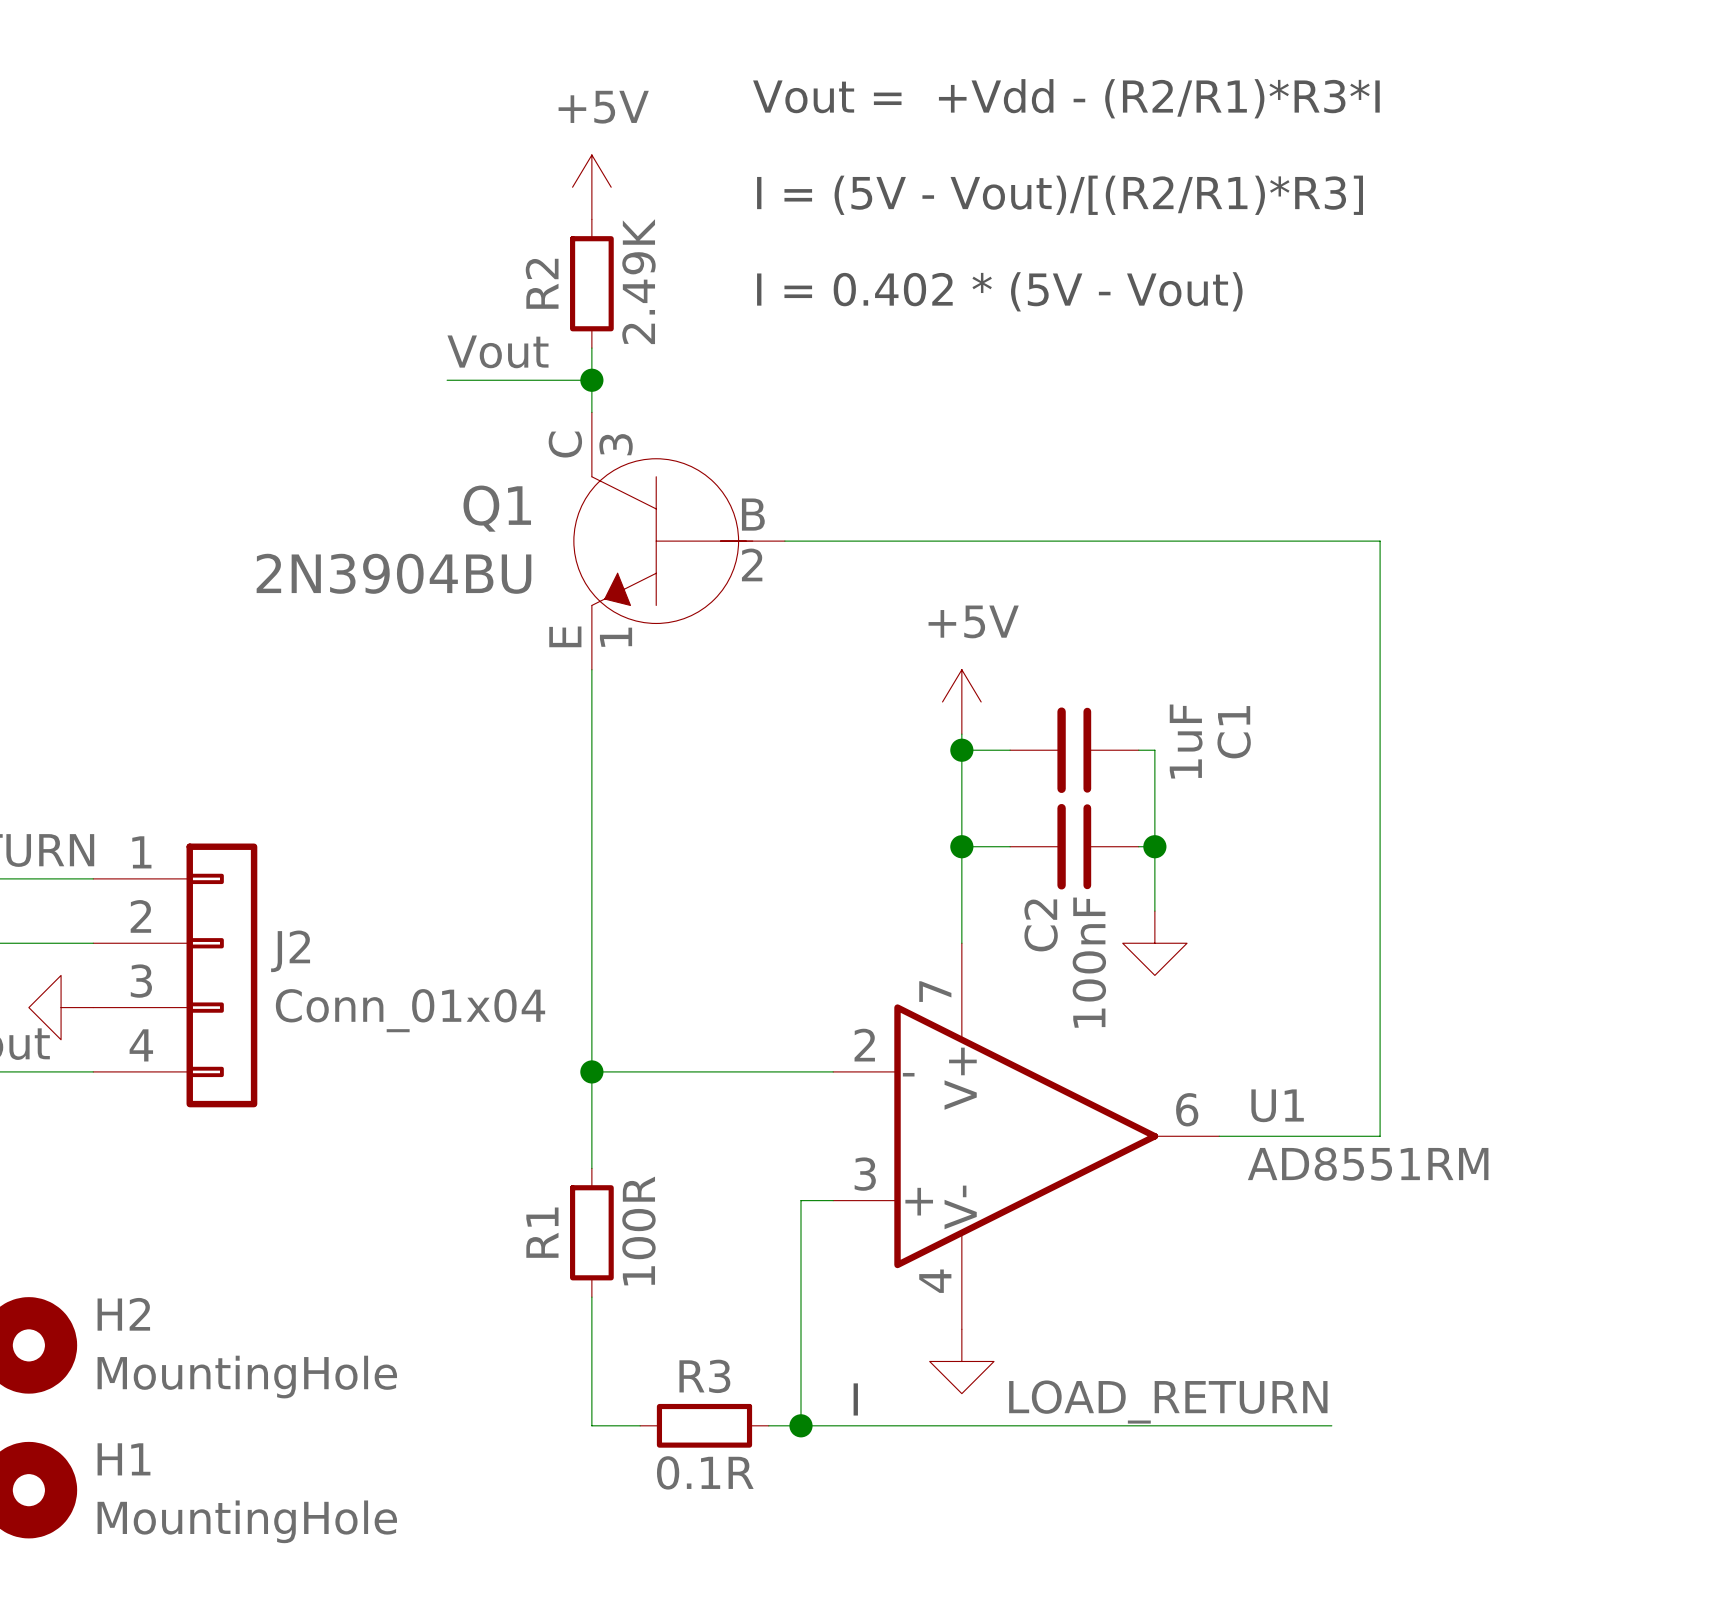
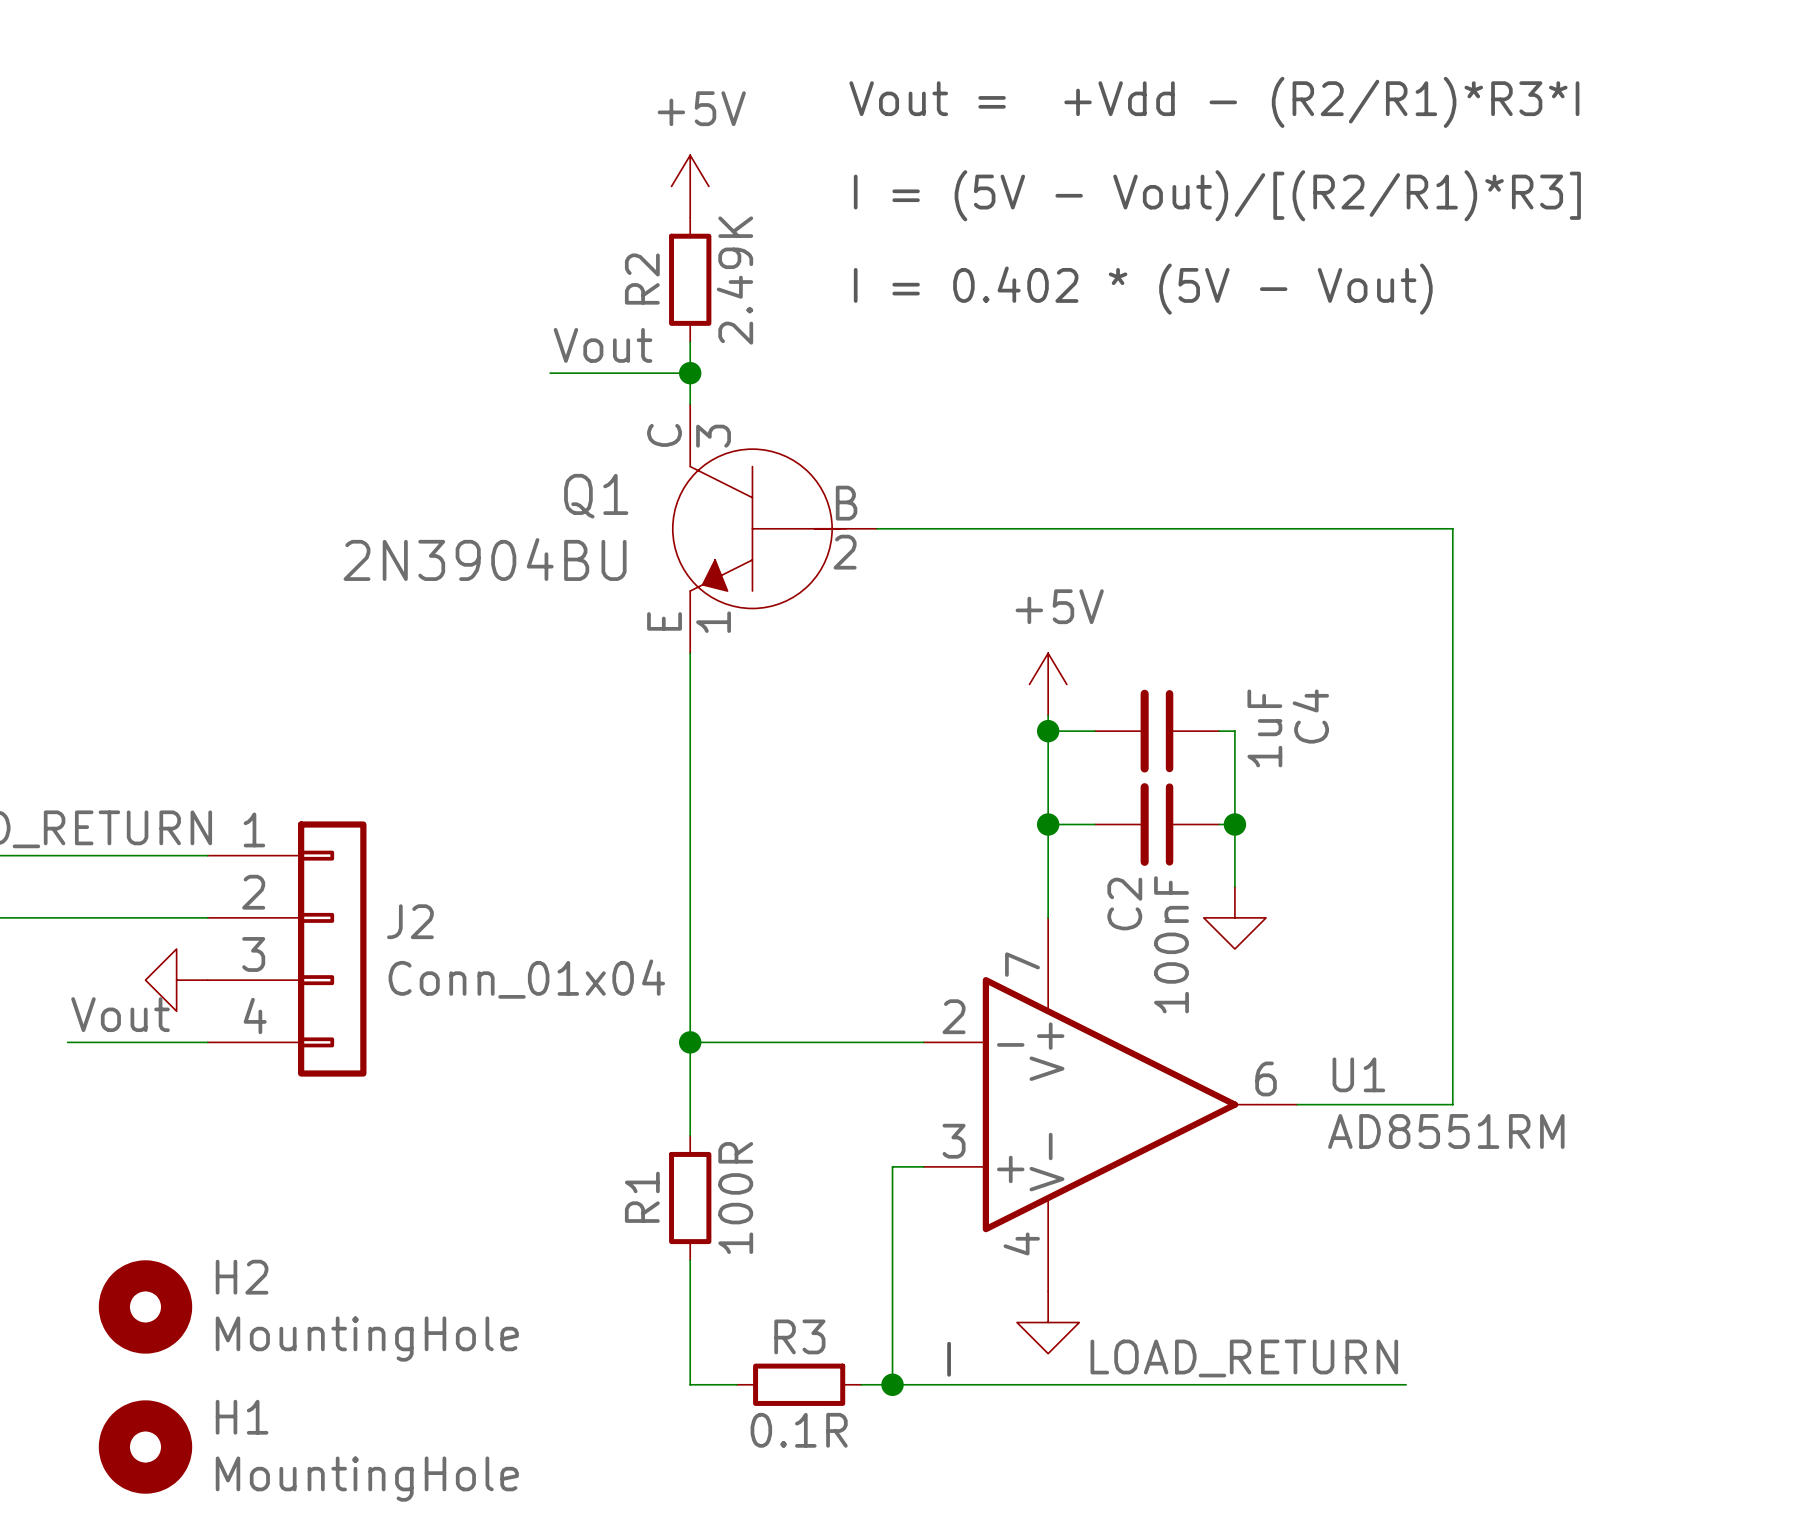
C1 name: C1 (1234, 732) -> C4 (1310, 716)

